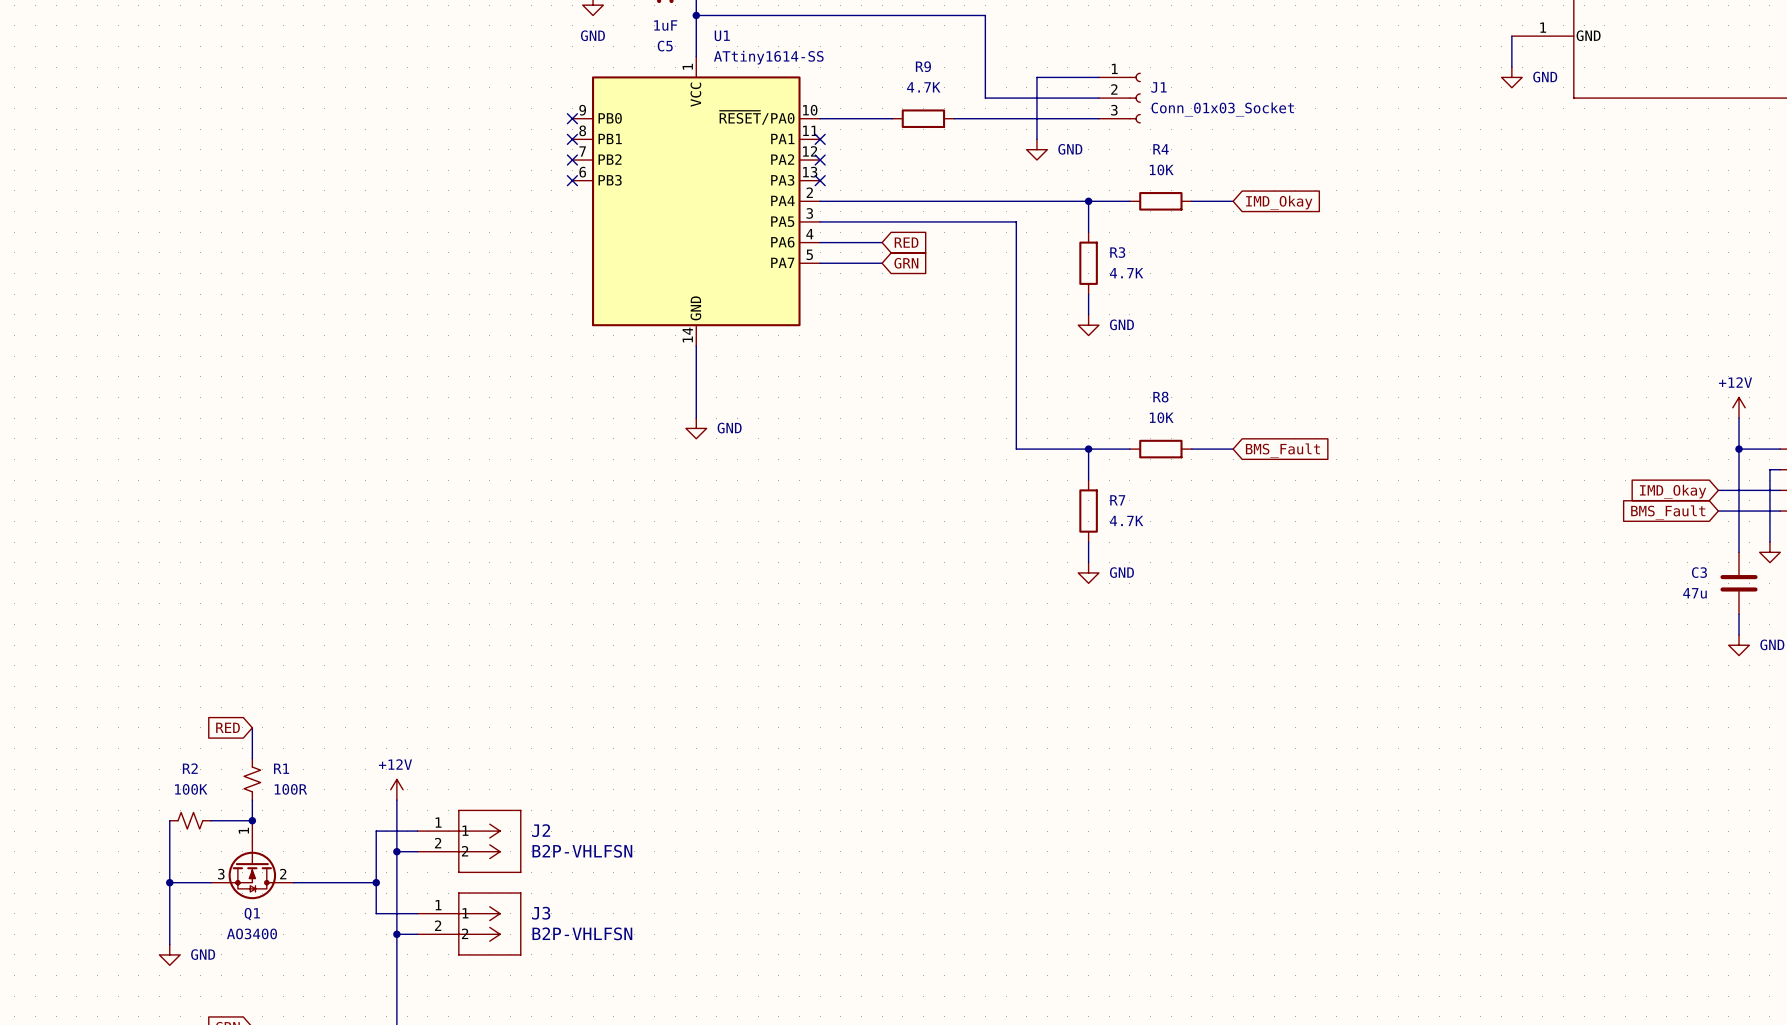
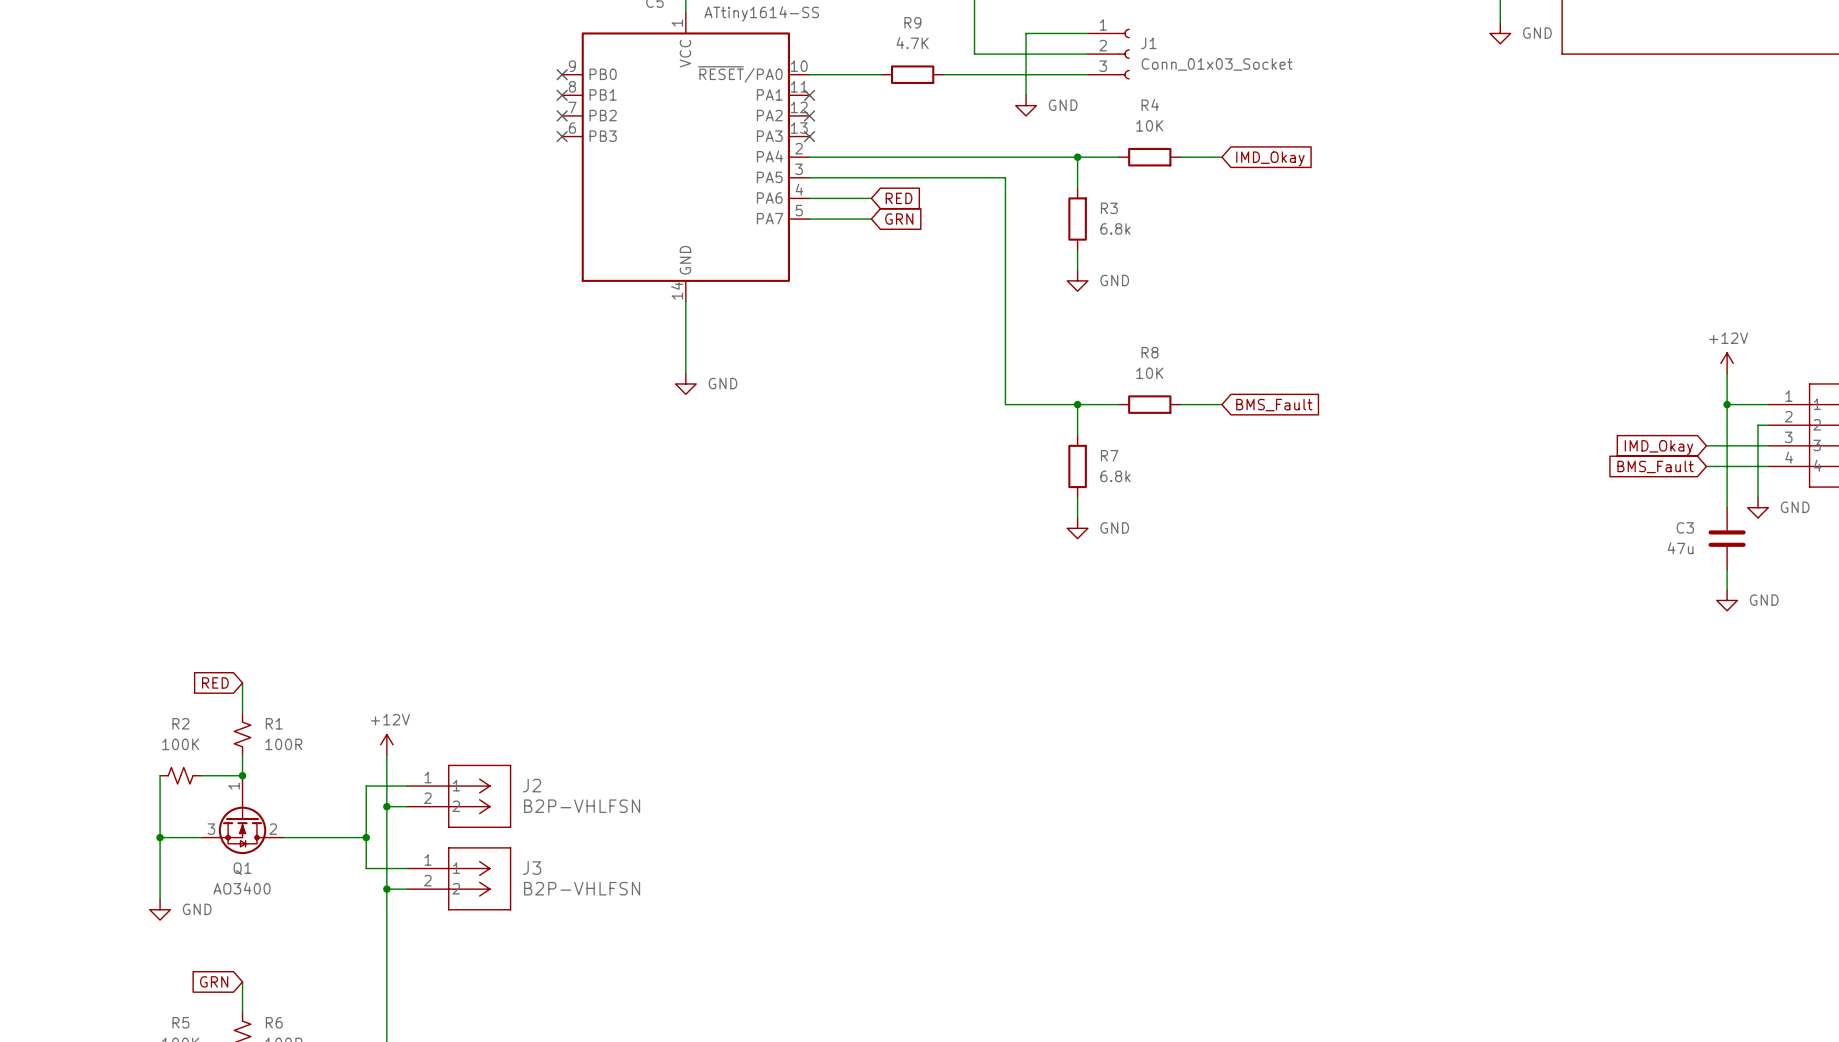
R3 value: 4.7K (1126, 273) -> 6.8k (1115, 228)
R7 value: 4.7K (1126, 520) -> 6.8k (1115, 476)

